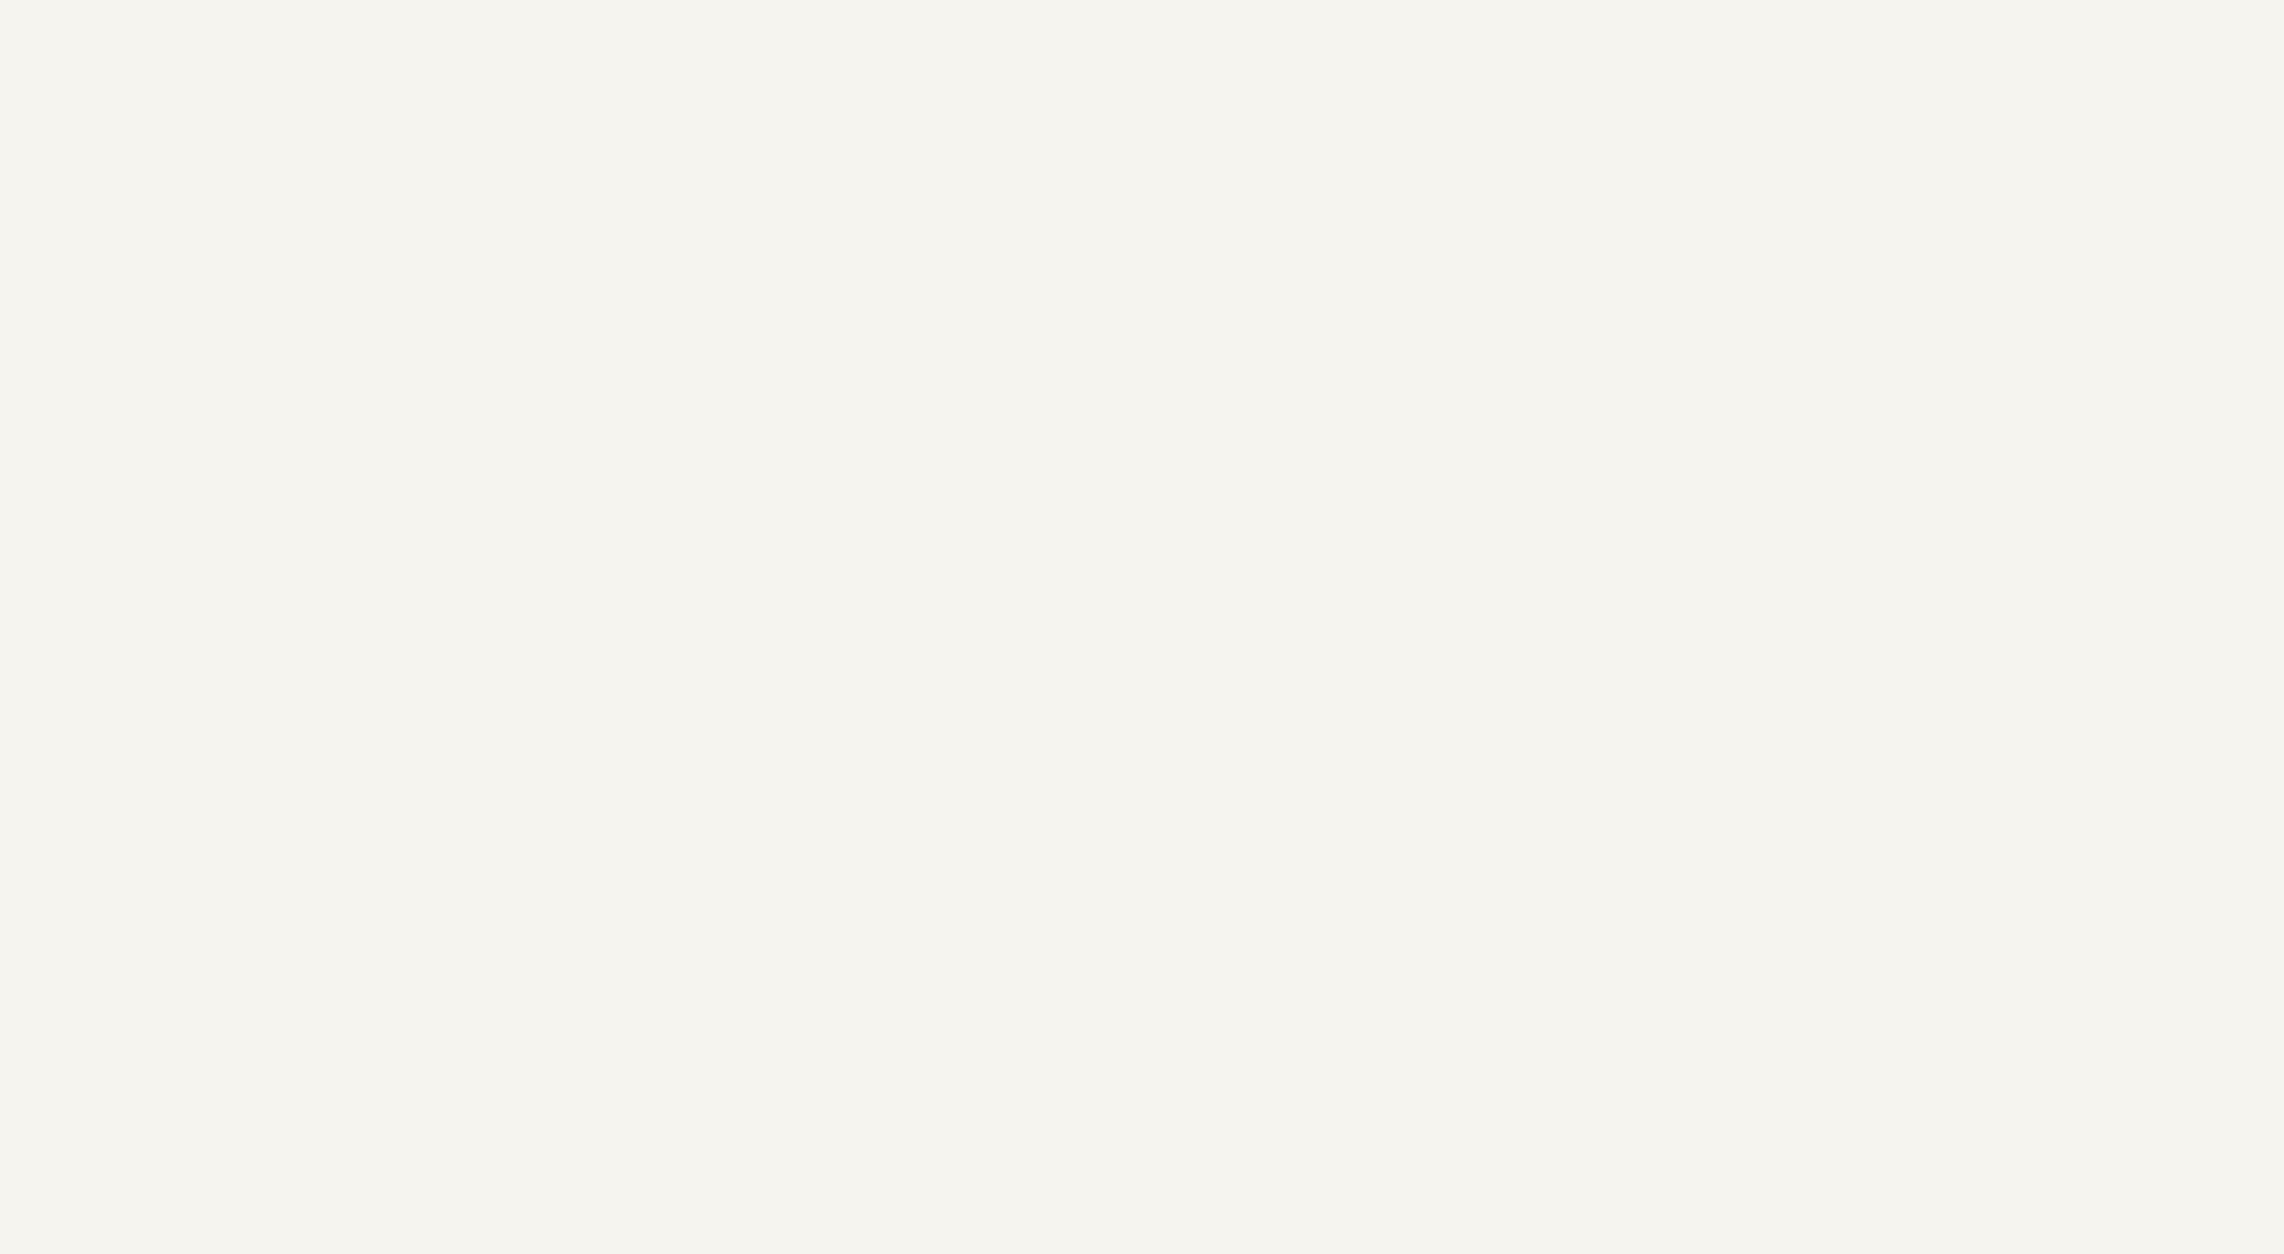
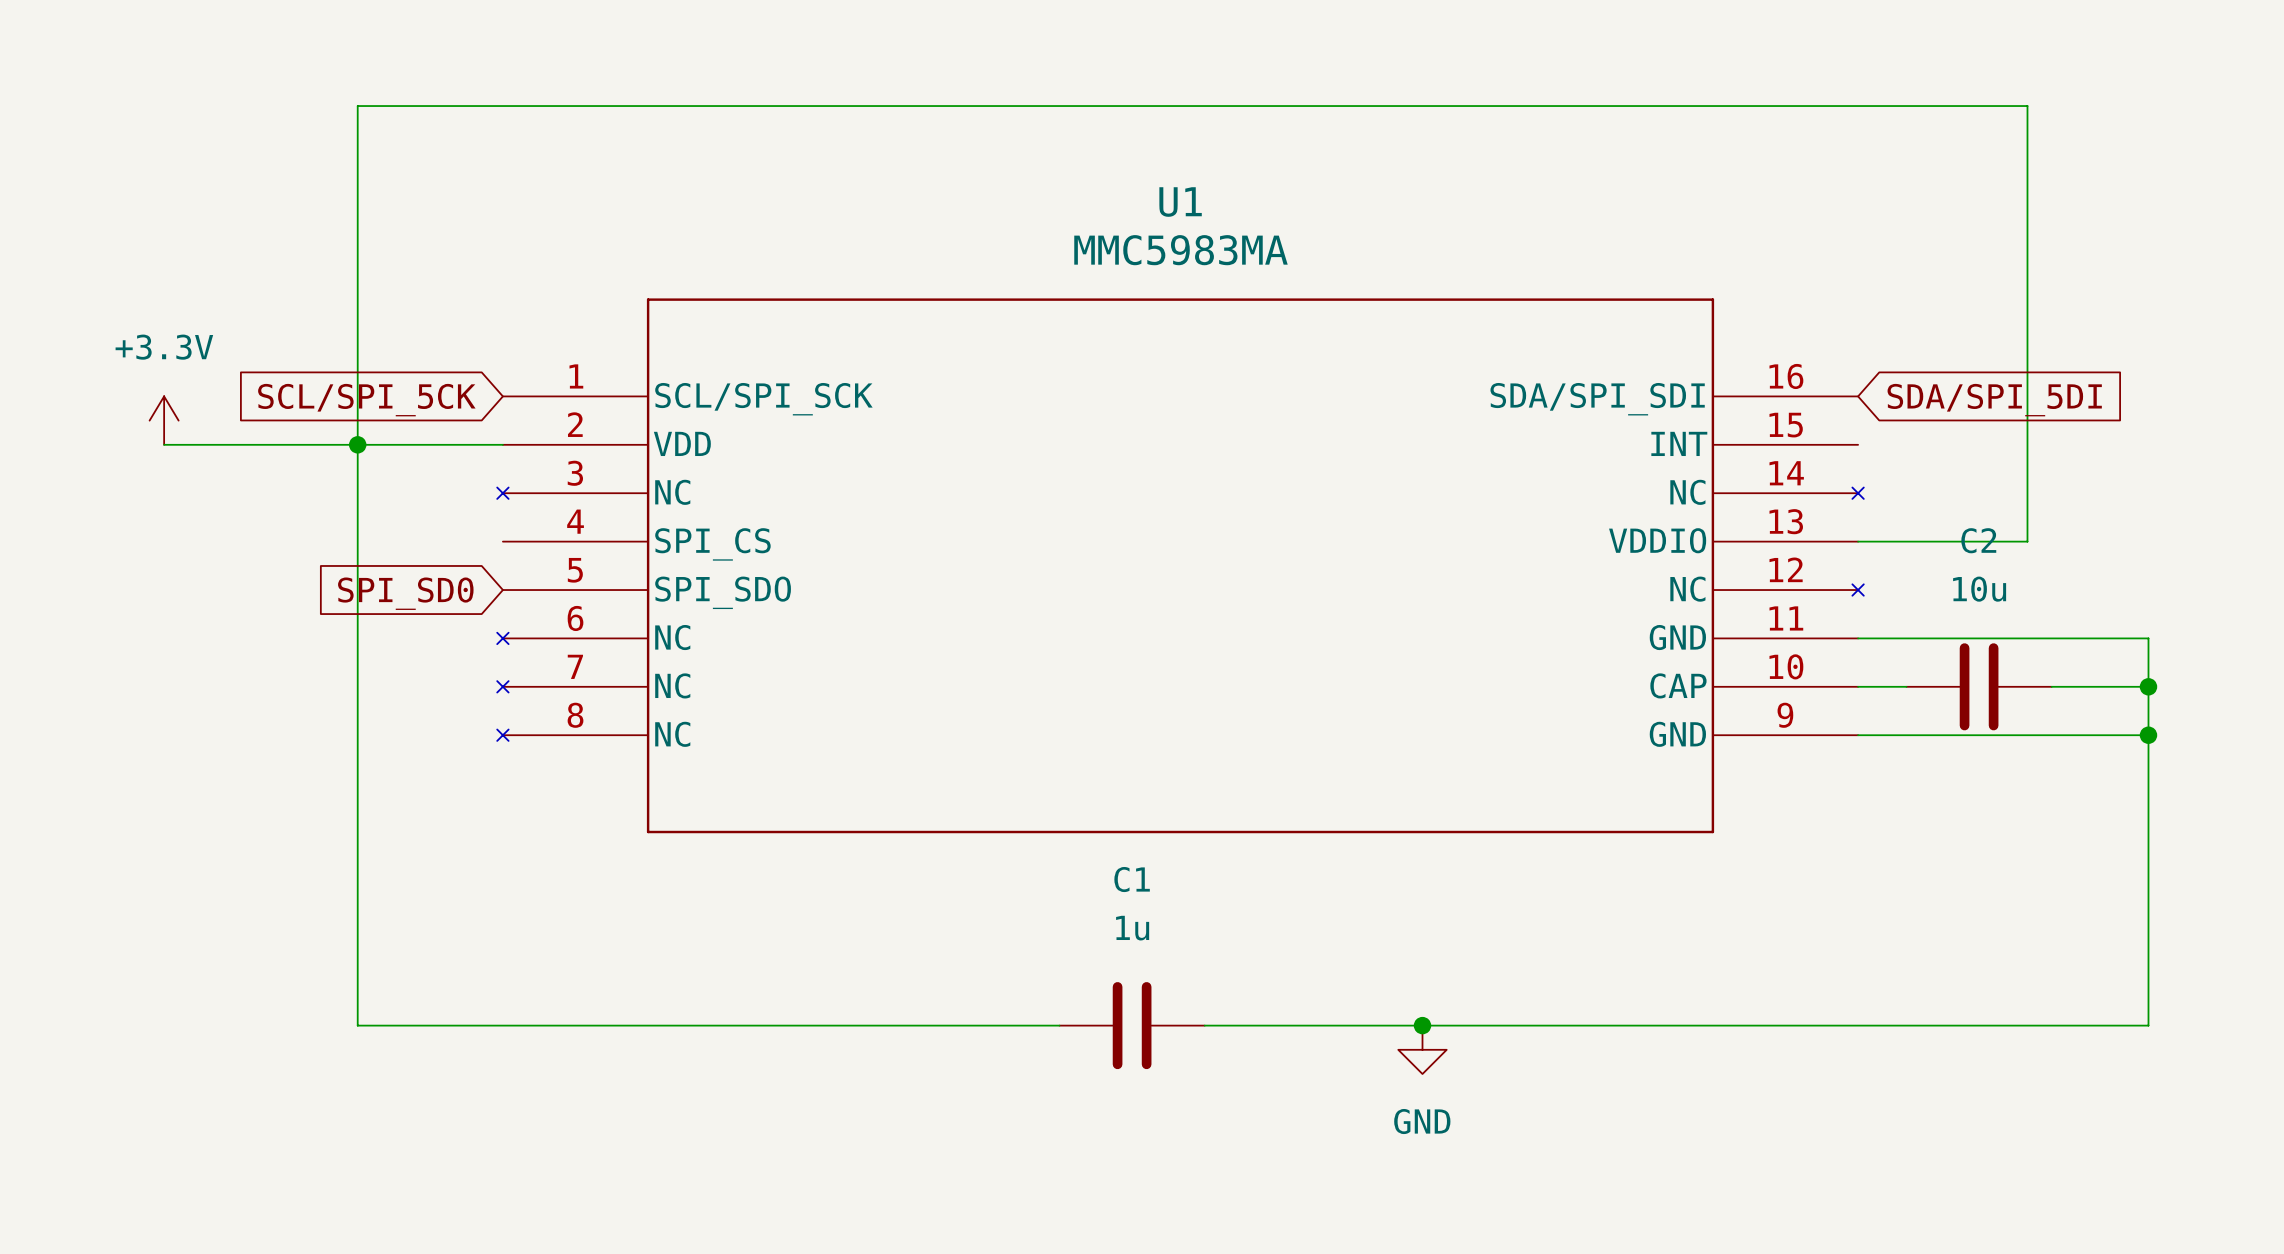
global label: none -> SCL/SPI_5CK (366, 400)
global label: none -> SDA/SPI_5DI (1994, 400)
power symbol: none -> +3.3V (164, 420)
wire: none -> (164, 444) (502, 444)
junction: none -> (357, 444)
wire: none -> (1858, 541) (2027, 541) (2027, 106) (357, 106) (357, 1025) (1059, 1025)
U1: none -> MMC5983MA (1180, 565)
global label: none -> SPI_SD0 (405, 593)
wire: none -> (1858, 638) (2148, 638) (2148, 1025) (1204, 1025)
wire: none -> (1858, 686) (1906, 686)
C2: none -> 10u (1979, 686)
wire: none -> (2051, 686) (2148, 686)
junction: none -> (2148, 686)
wire: none -> (1858, 735) (2148, 735)
junction: none -> (2148, 735)
C1: none -> 1u (1132, 1025)
junction: none -> (1422, 1025)
power symbol: none -> GND (1422, 1049)

